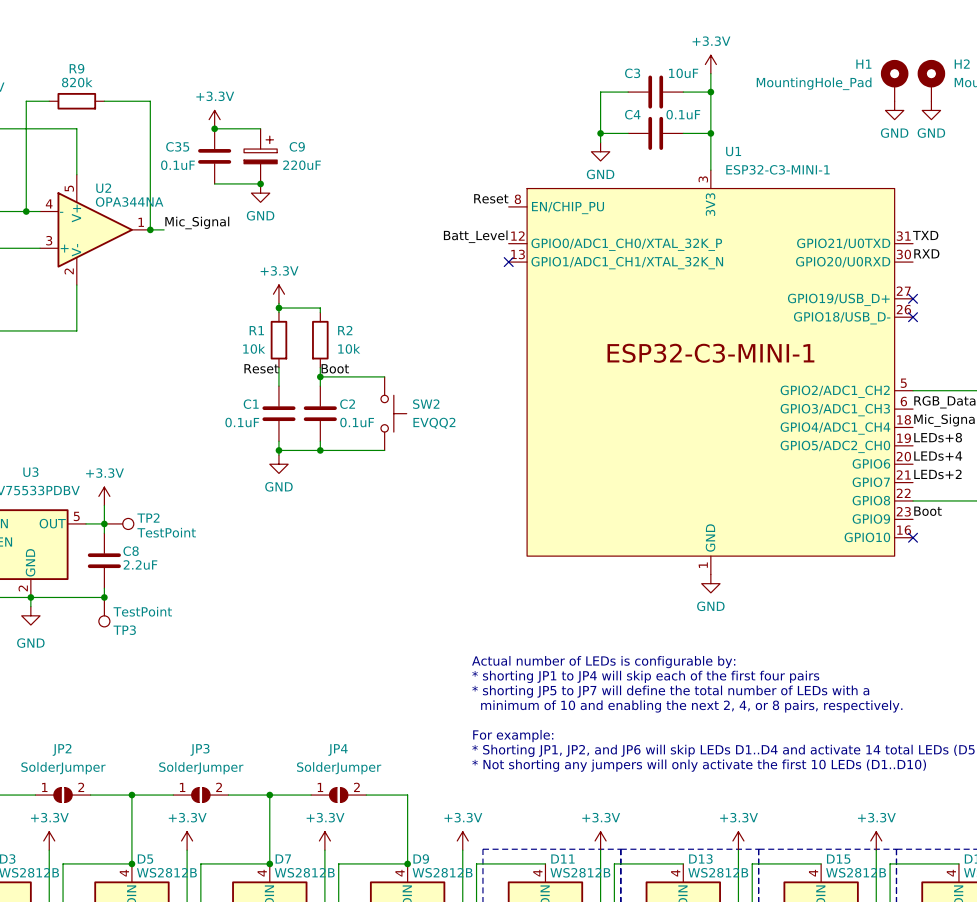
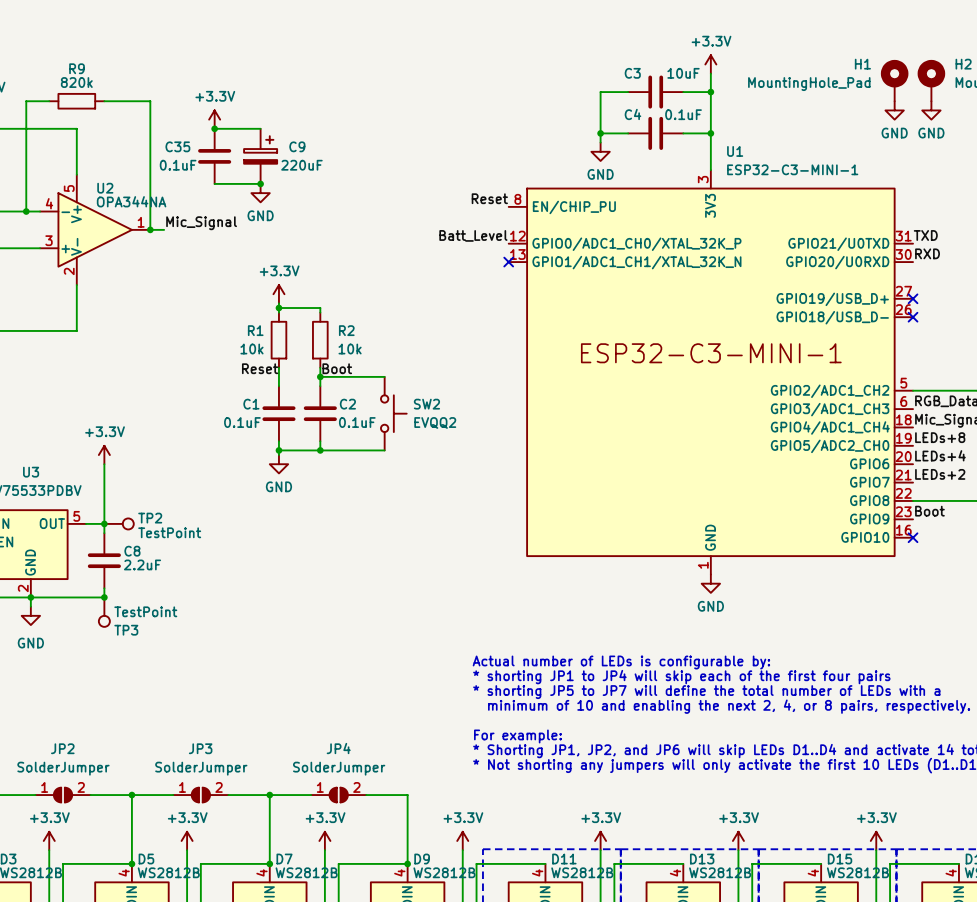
wire: none -> (104, 464) (104, 505)
power symbol position: +3.3V (104, 496) -> +3.3V (104, 455)

